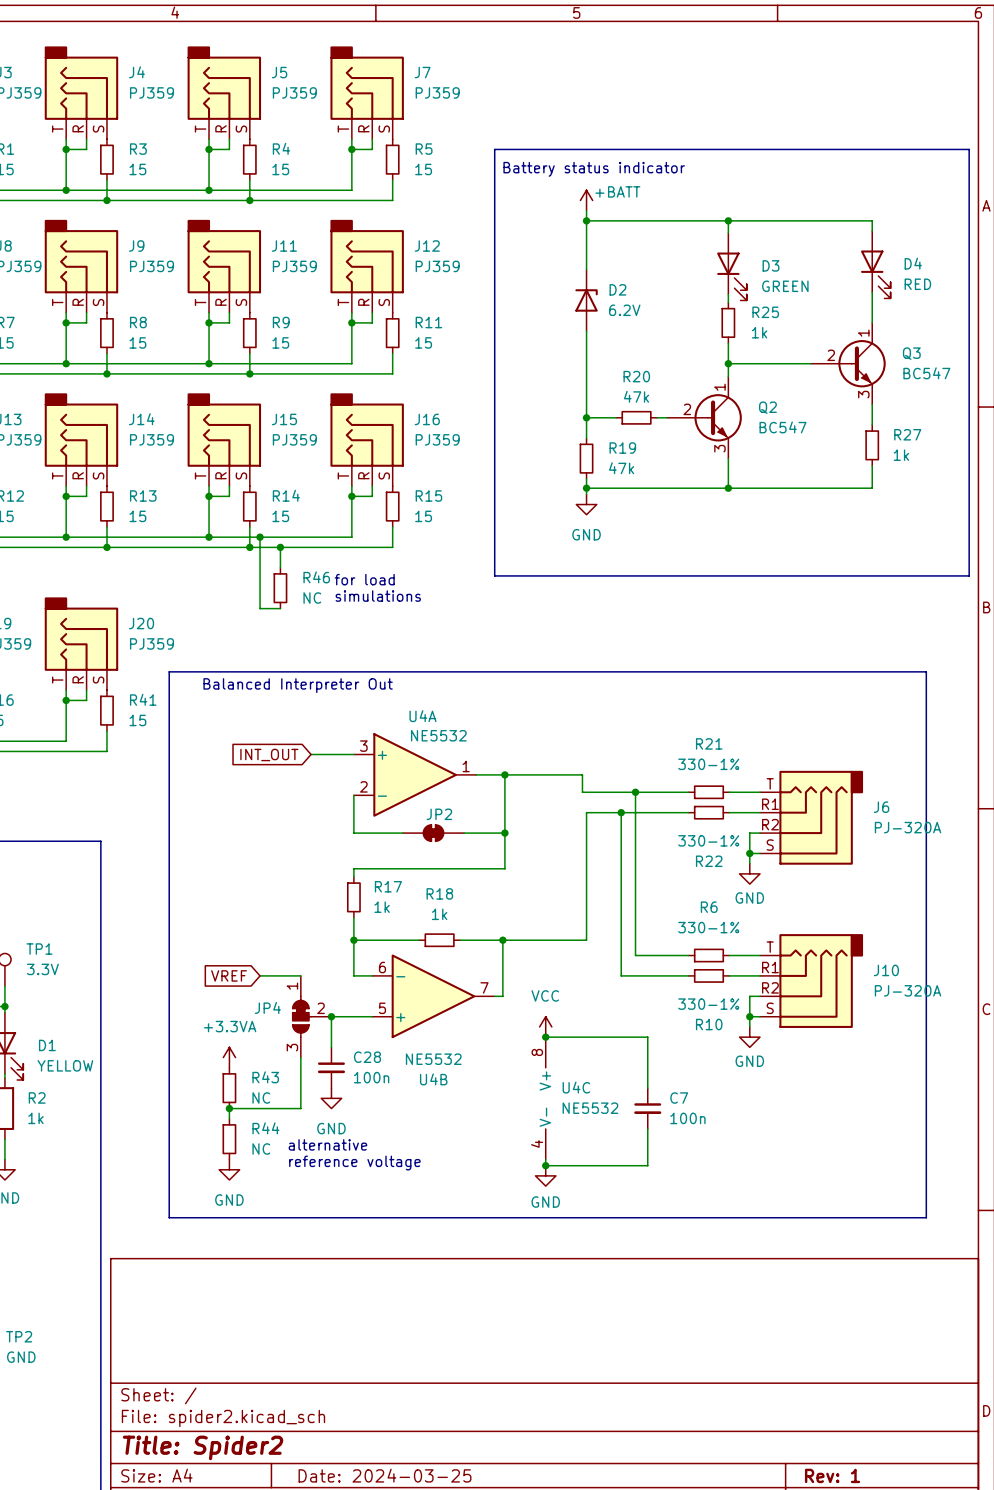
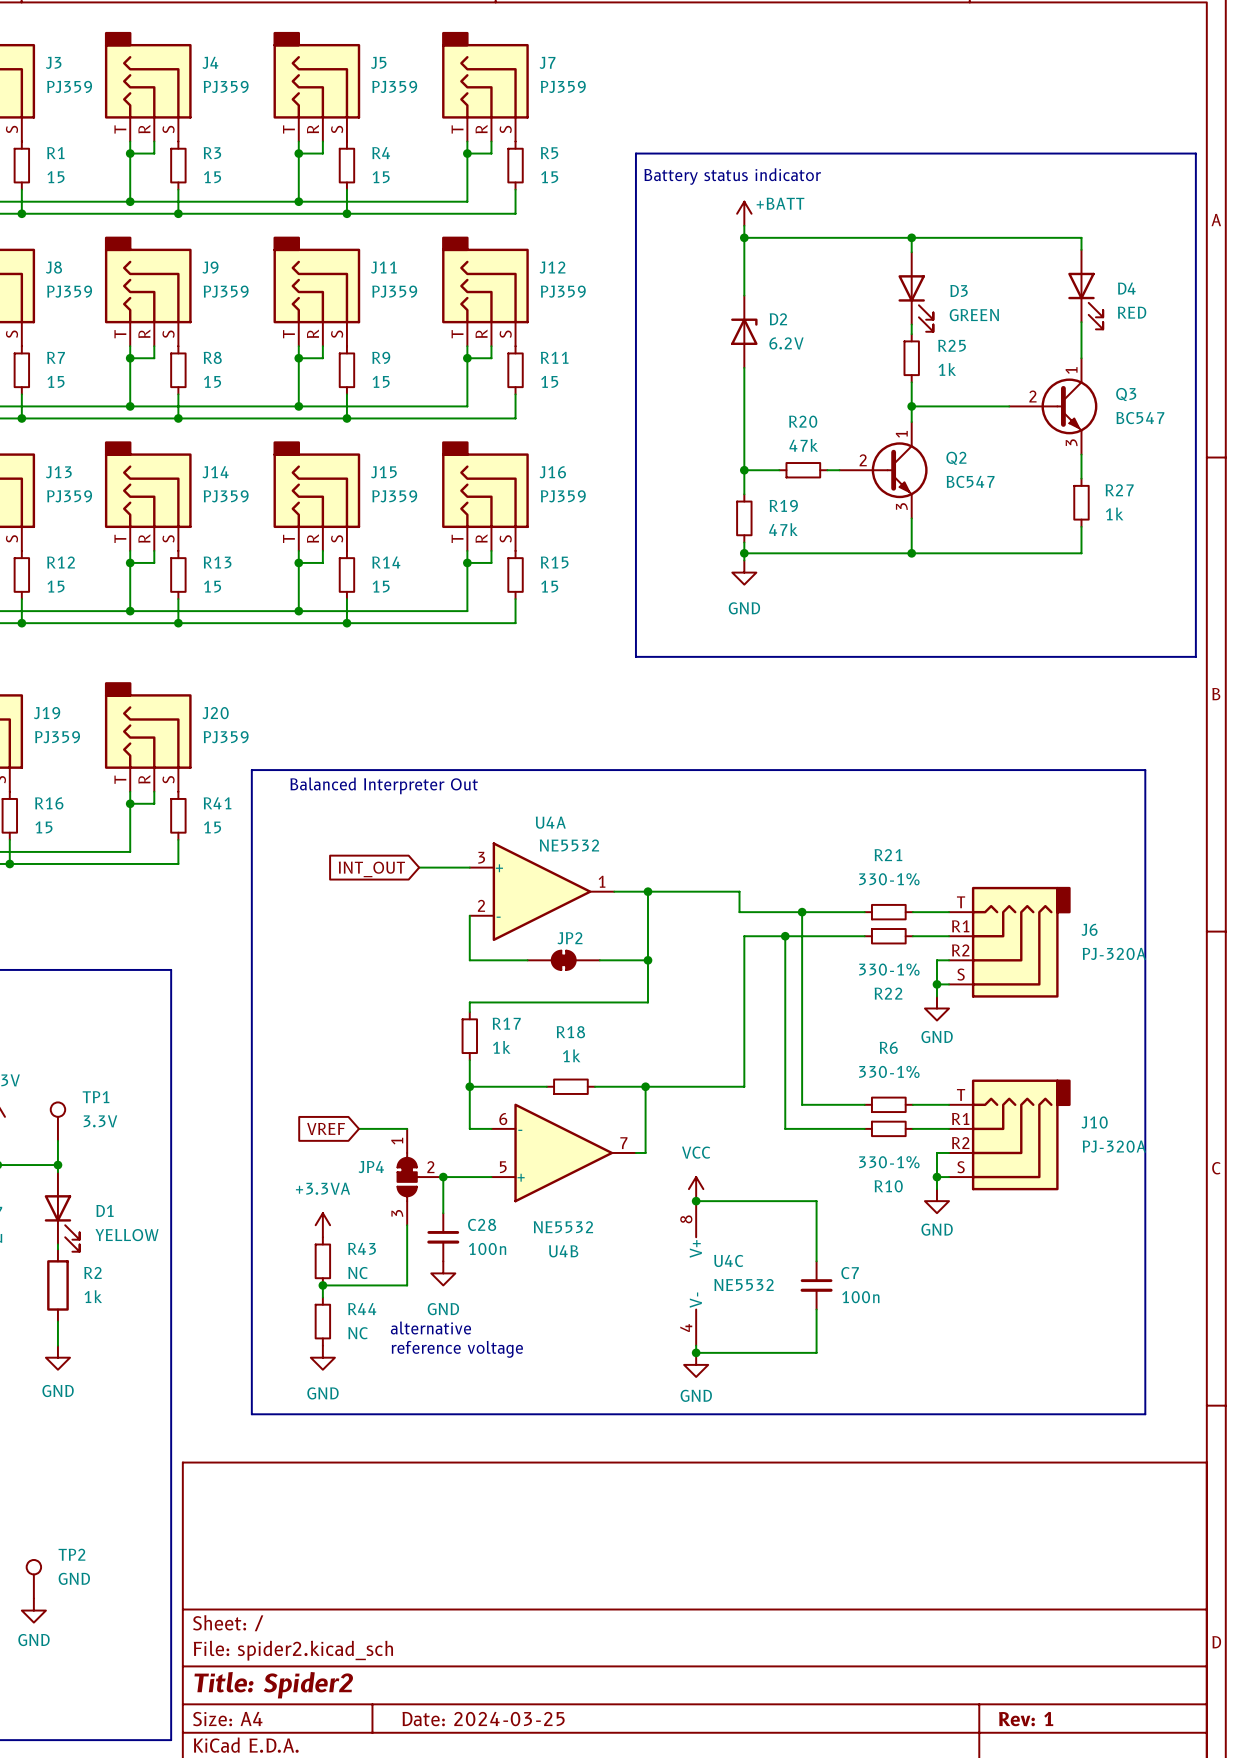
wire: (260, 537) (260, 608) (280, 608) -> none
junction: (260, 537) -> none
wire: (280, 547) (280, 567) -> none
junction: (280, 547) -> none
text: for load (364, 579) -> none
R46: NC (280, 588) -> none
text: simulations (378, 596) -> none

